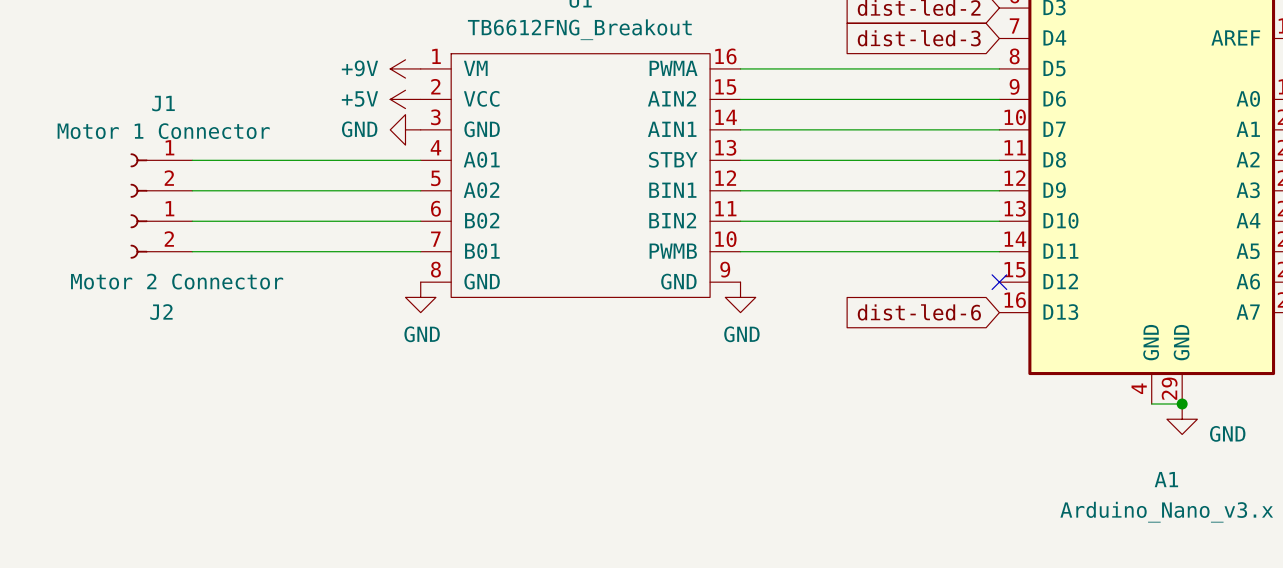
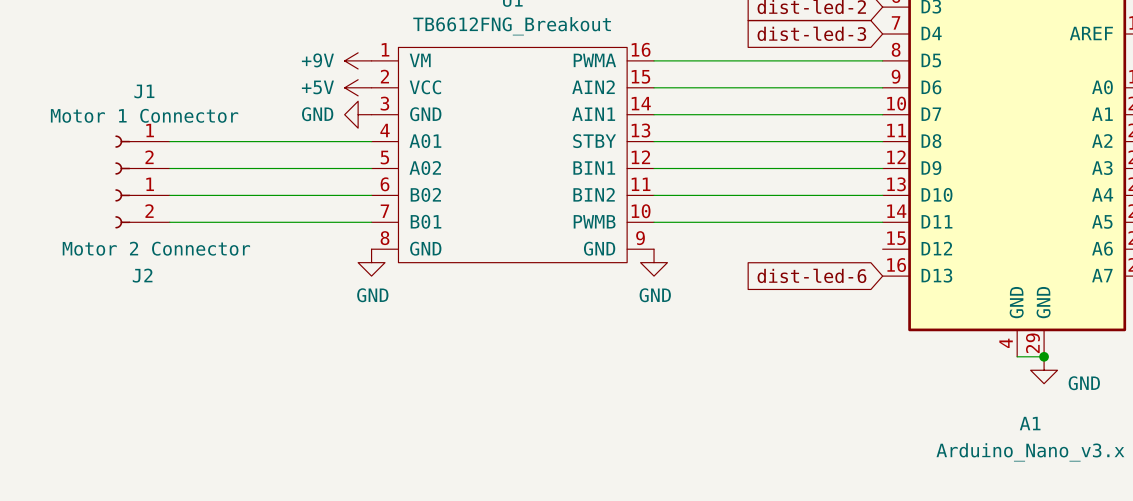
no-connect mark: (999, 282) -> none

